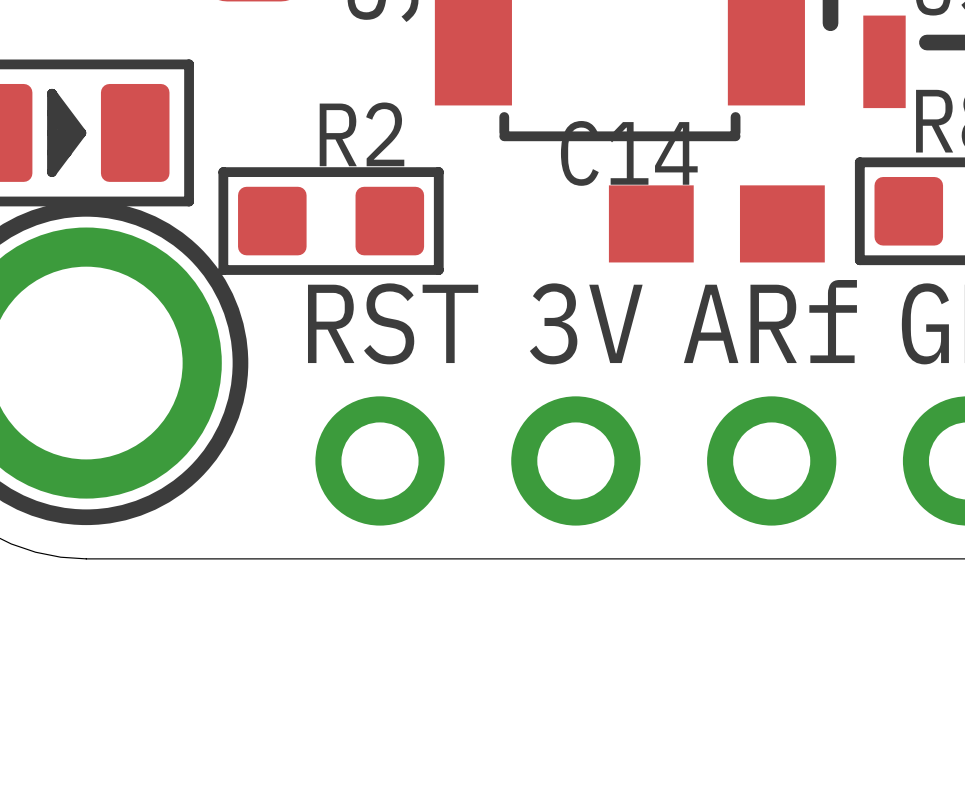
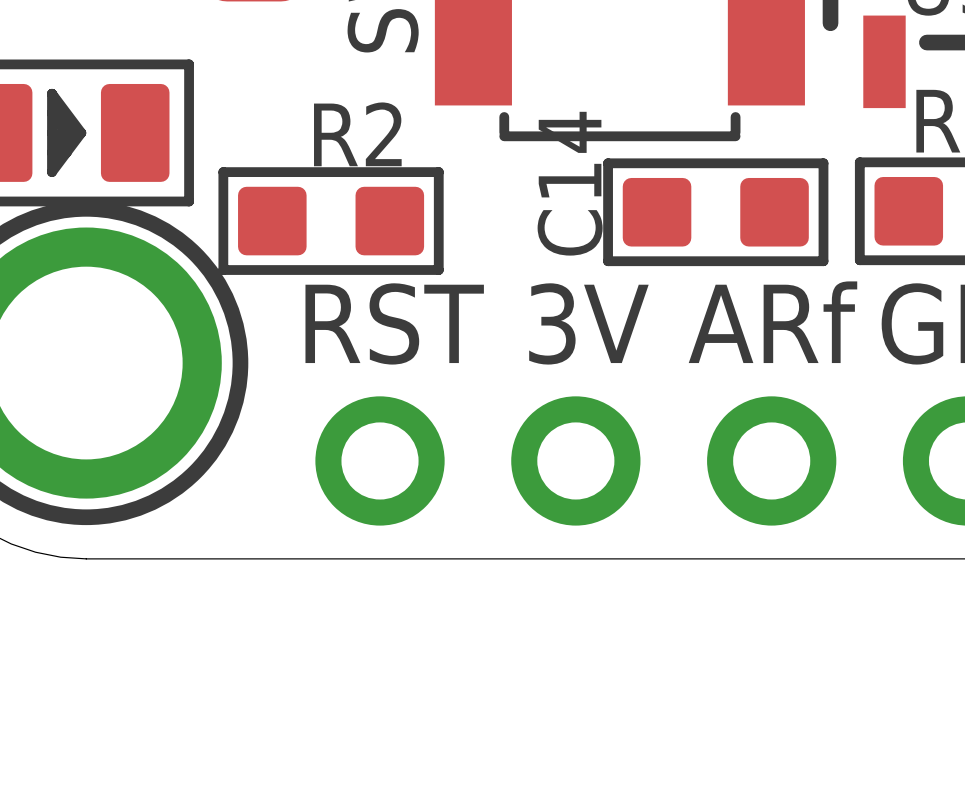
C14 footprint: [608, 185, 825, 263] -> [603, 158, 829, 267]

